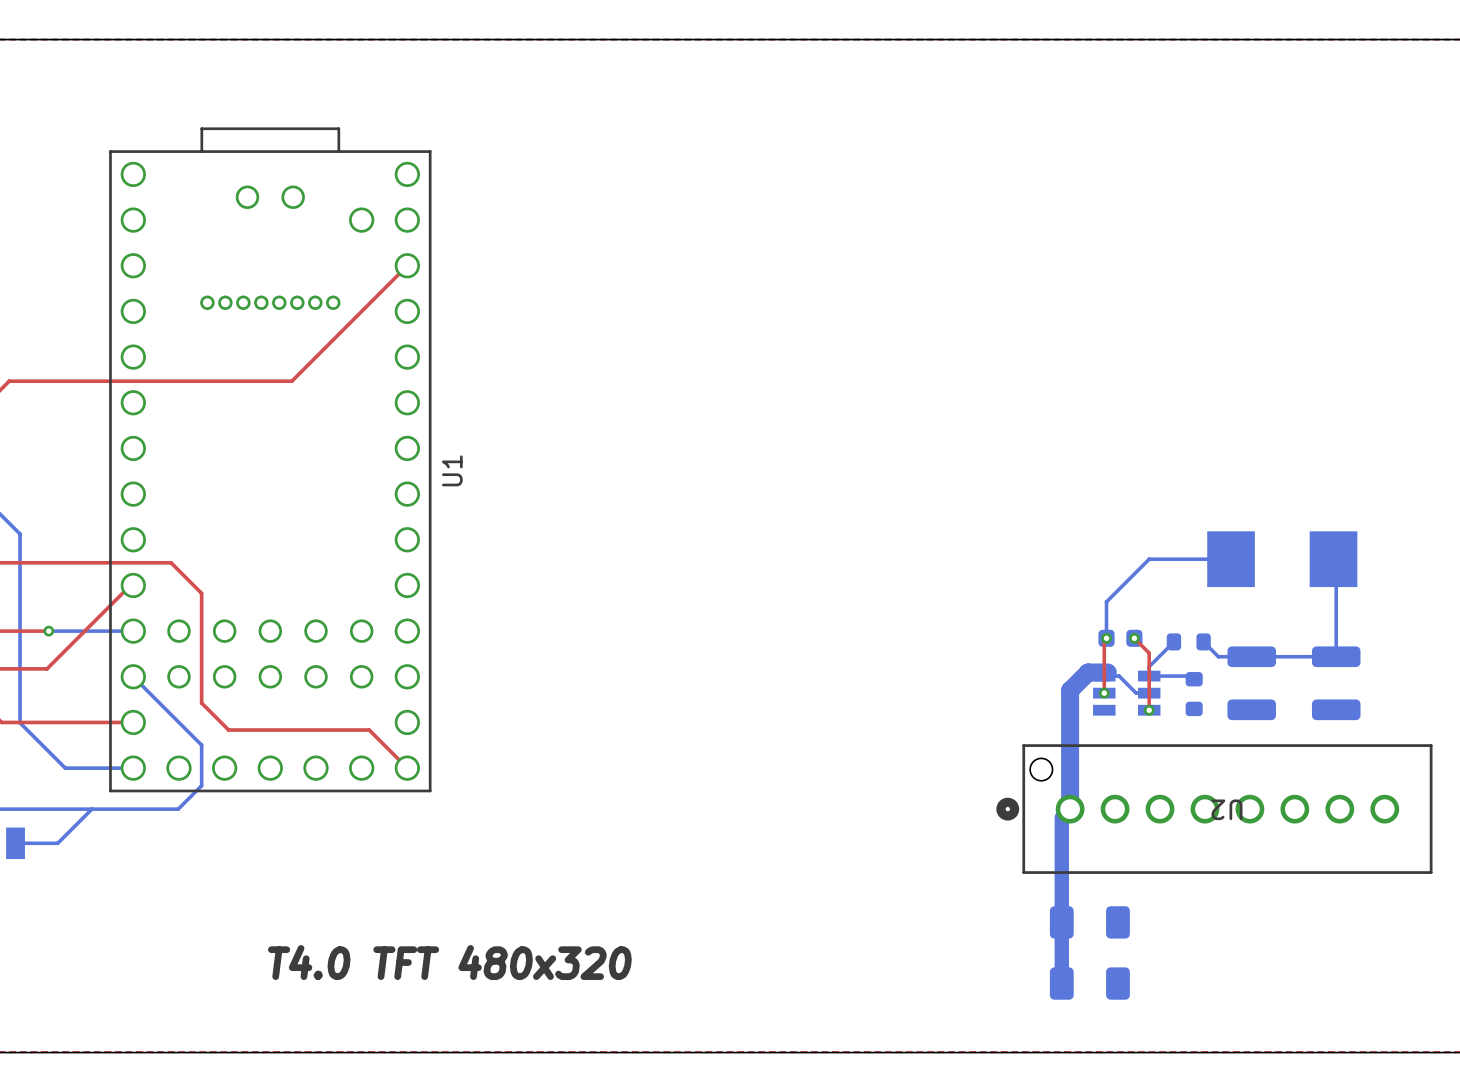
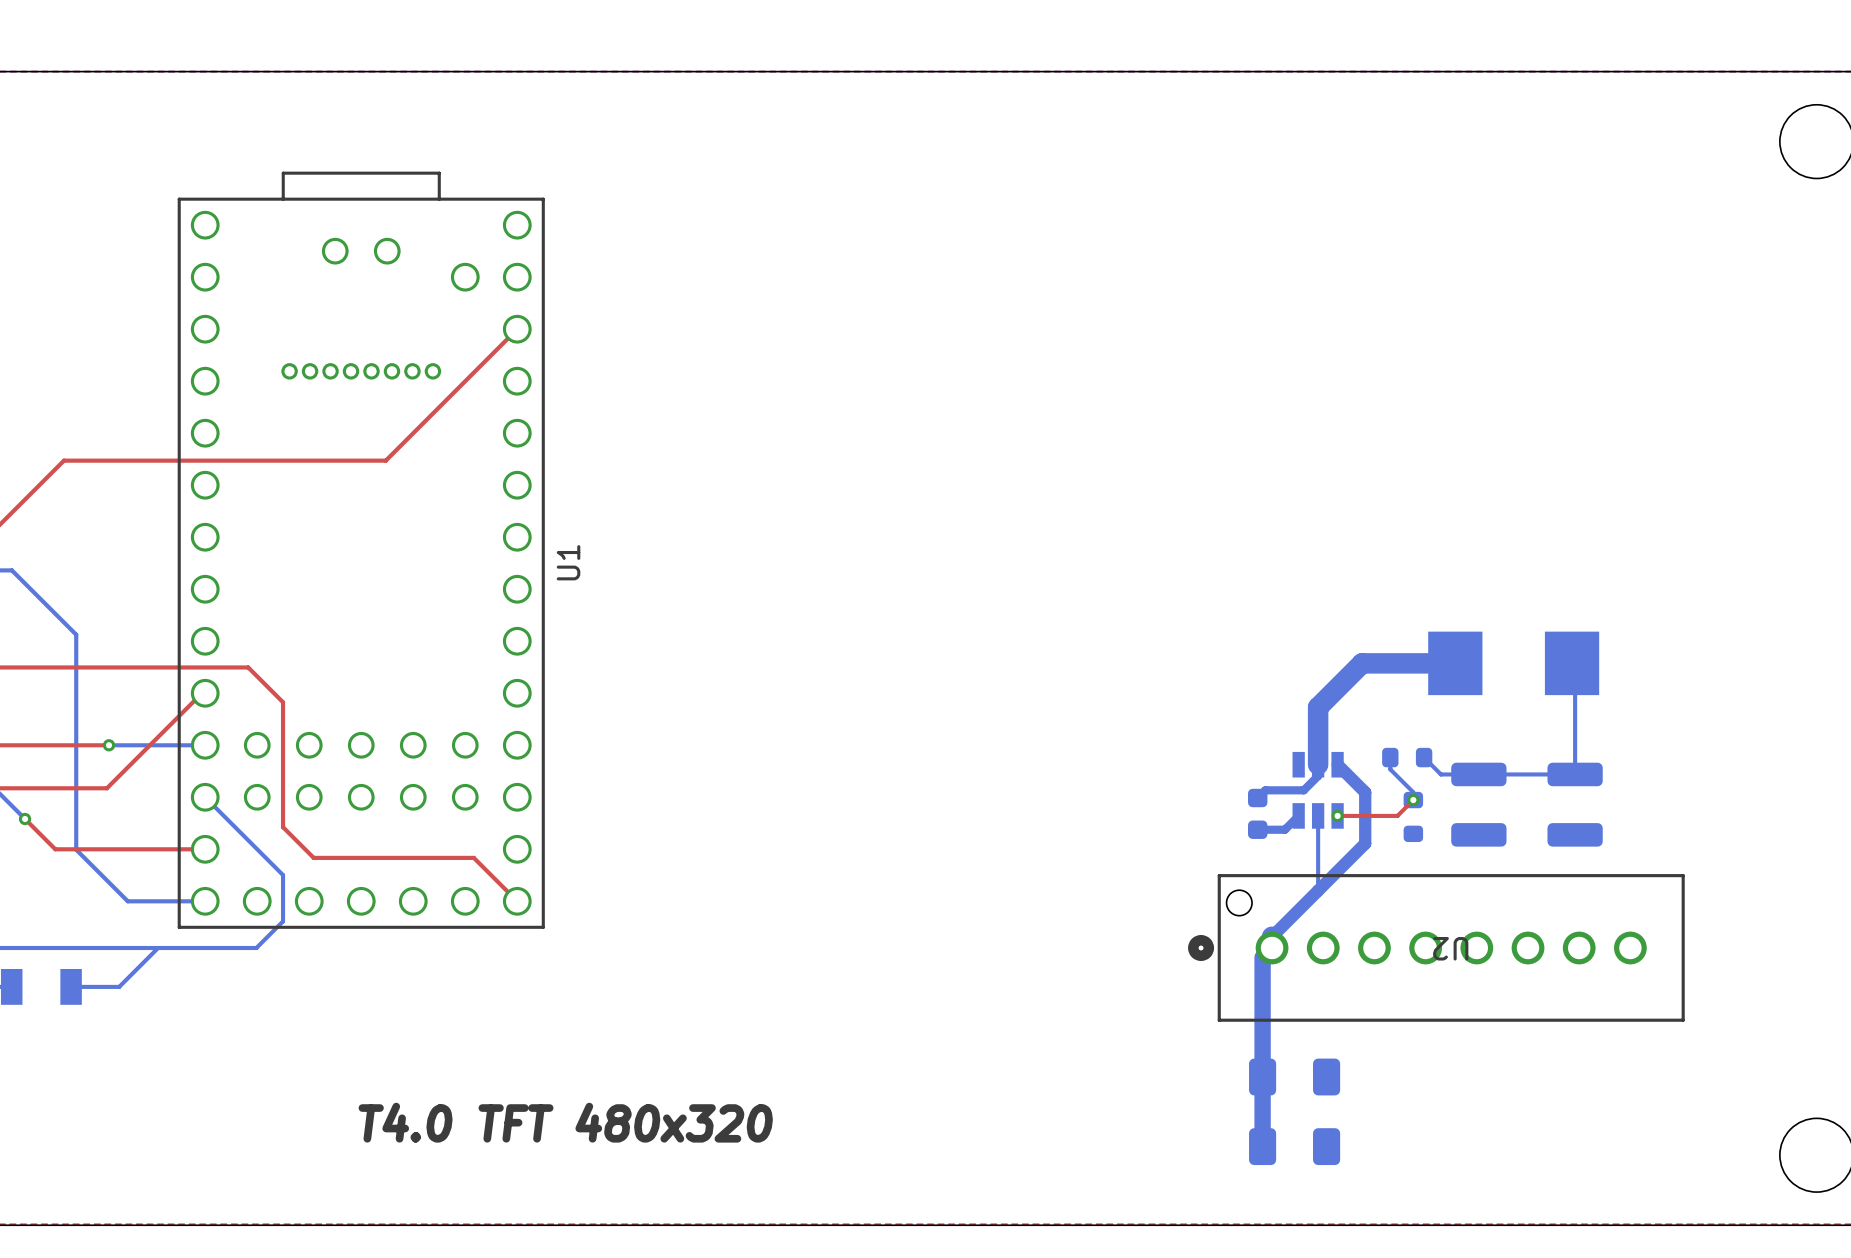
bottom track width: thin (1231, 559) (1149, 559) (1110, 597) -> thick (1455, 663) (1362, 663) (1318, 707)
bottom track: (1110, 597) (1106, 601) (1106, 638) -> (1318, 707) (1318, 775) (1303, 790) (1265, 790) (1257, 798)
top track: (1106, 638) (1104, 640) (1104, 693) -> none
via: (1106, 638) -> none
part rotation: 0° (1120, 638) -> 90° clockwise (1257, 813)
part position: (1120, 638) -> (1257, 813)
top track: (1134, 638) (1149, 653) (1149, 710) -> none
via: (1134, 638) -> none
bottom track: (1173, 641) (1149, 666) (1149, 676) (1191, 676) -> (1390, 757) (1390, 769) (1413, 792) (1413, 800)
bottom track: (1107, 672) (1088, 672) (1070, 690) (1070, 799) -> (1337, 764) (1365, 792) (1365, 843) (1272, 936)
bottom track: (1104, 676) (1119, 676) (1136, 693) (1149, 693) -> none
top track: none -> (1413, 800) (1397, 815) (1337, 815)
via: none -> (1413, 800)
bottom track: none -> (1298, 815) (1284, 829) (1257, 829)
via: (1104, 693) -> none
bottom track: none -> (1318, 815) (1318, 890)
part rotation: 0° (1126, 693) -> 90° clockwise (1318, 790)
via: none -> (1337, 815)
via: (1149, 710) -> none

